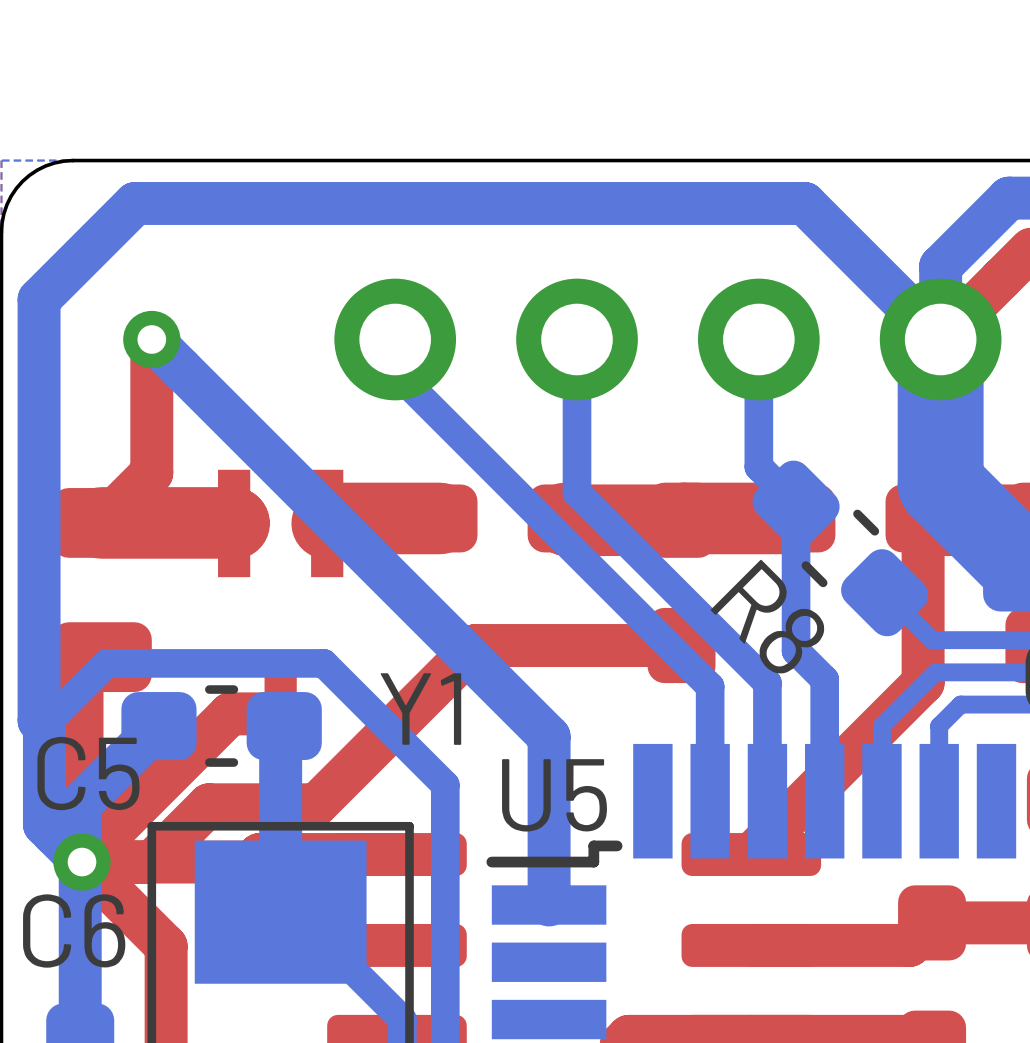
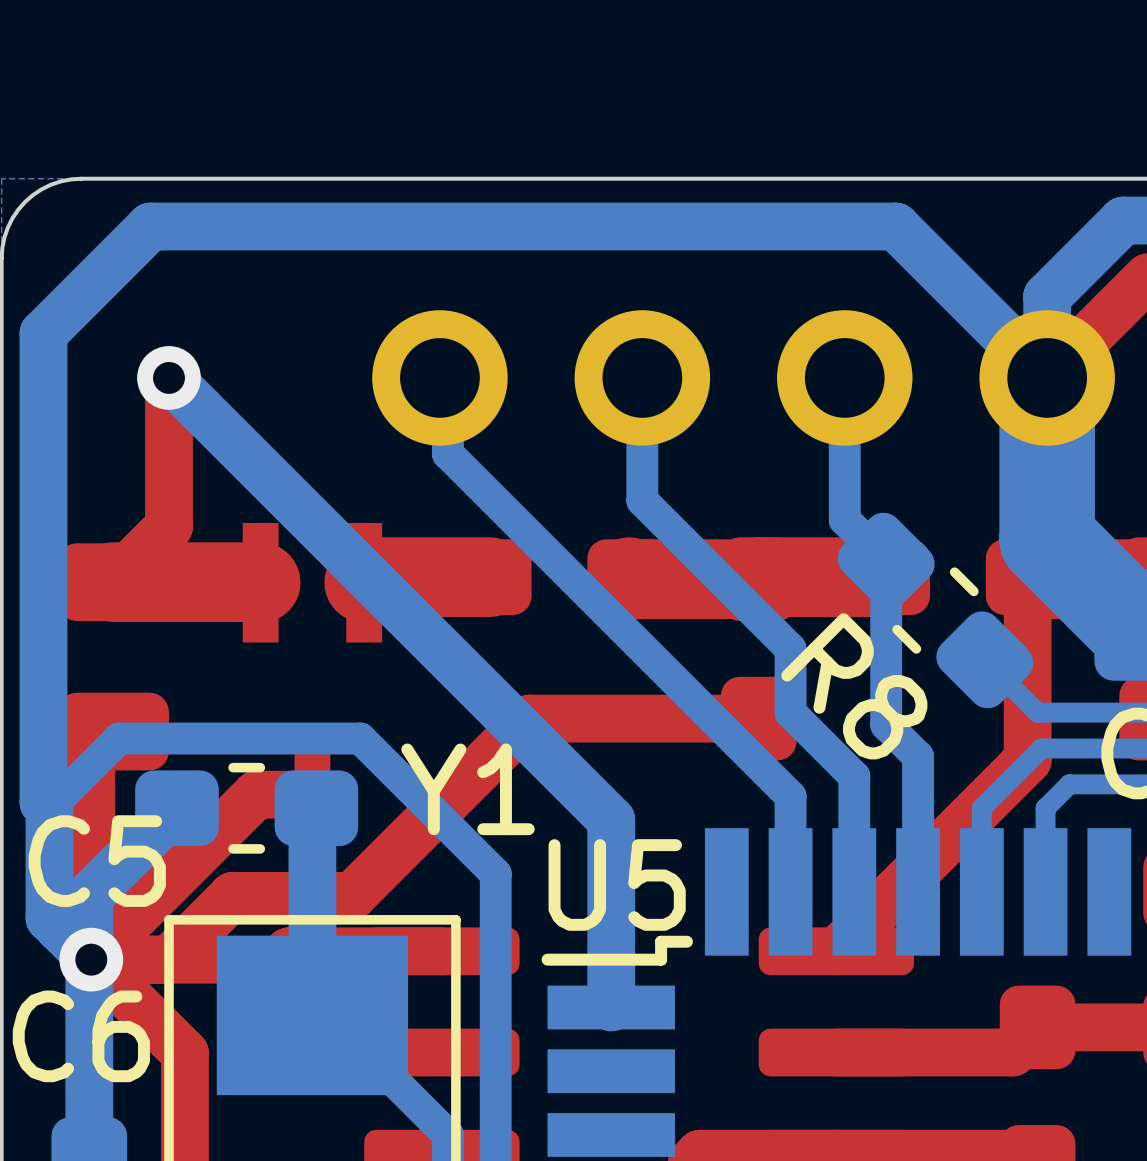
bottom track: (395, 371) (710, 686) (710, 715) -> (439, 377) (447, 385) (447, 453) (790, 796)
bottom track: (577, 449) (577, 492) (767, 683) (767, 697) -> (642, 500) (790, 648) (790, 712) (854, 776)

